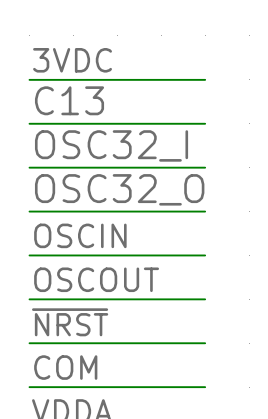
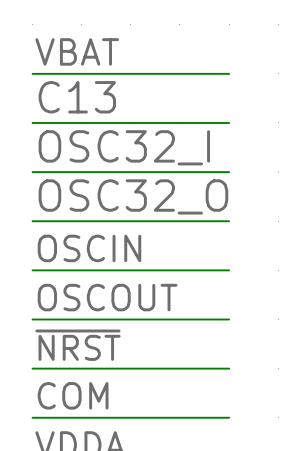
label: 3VDC (72, 60) -> VBAT (77, 51)

